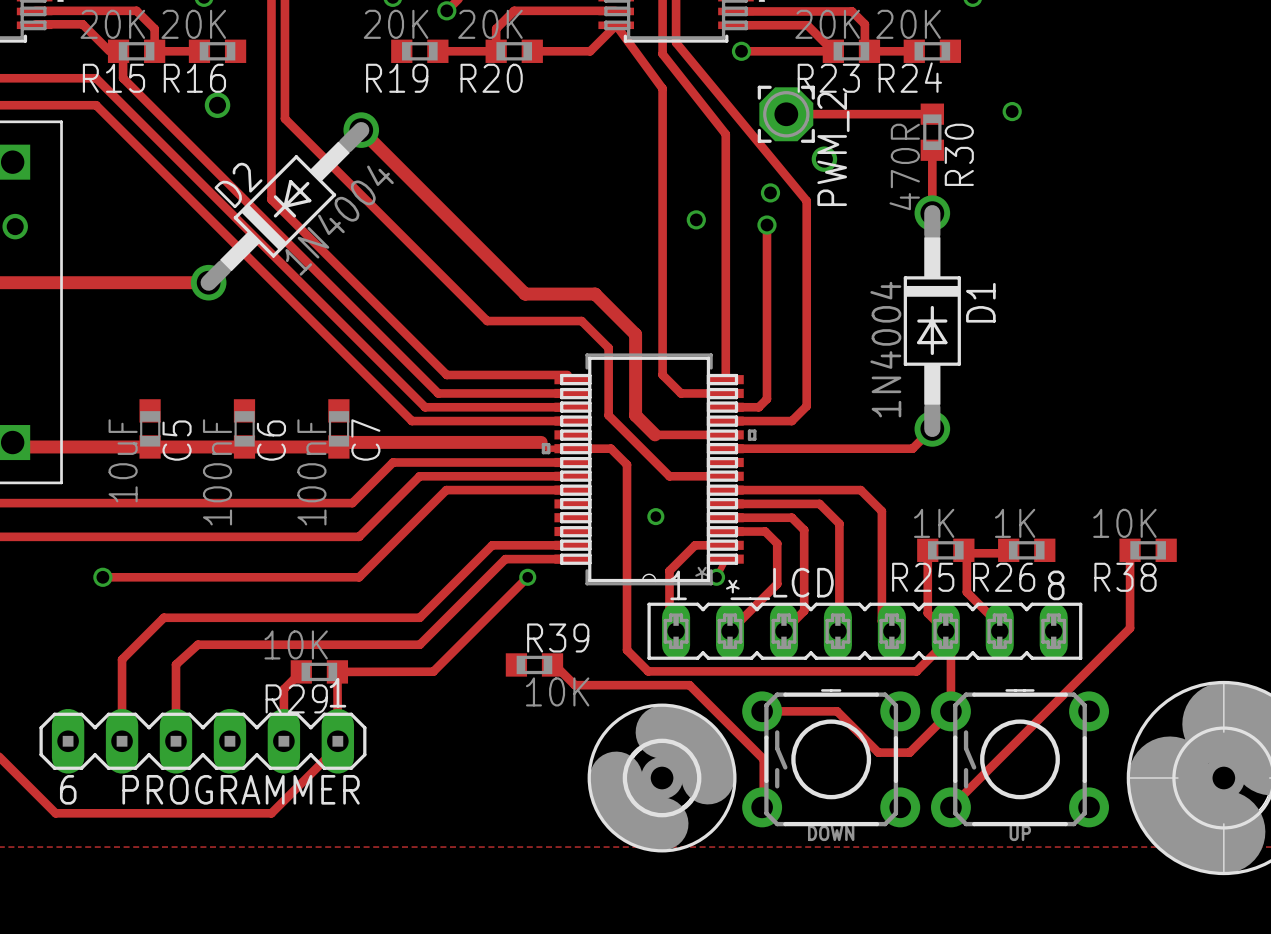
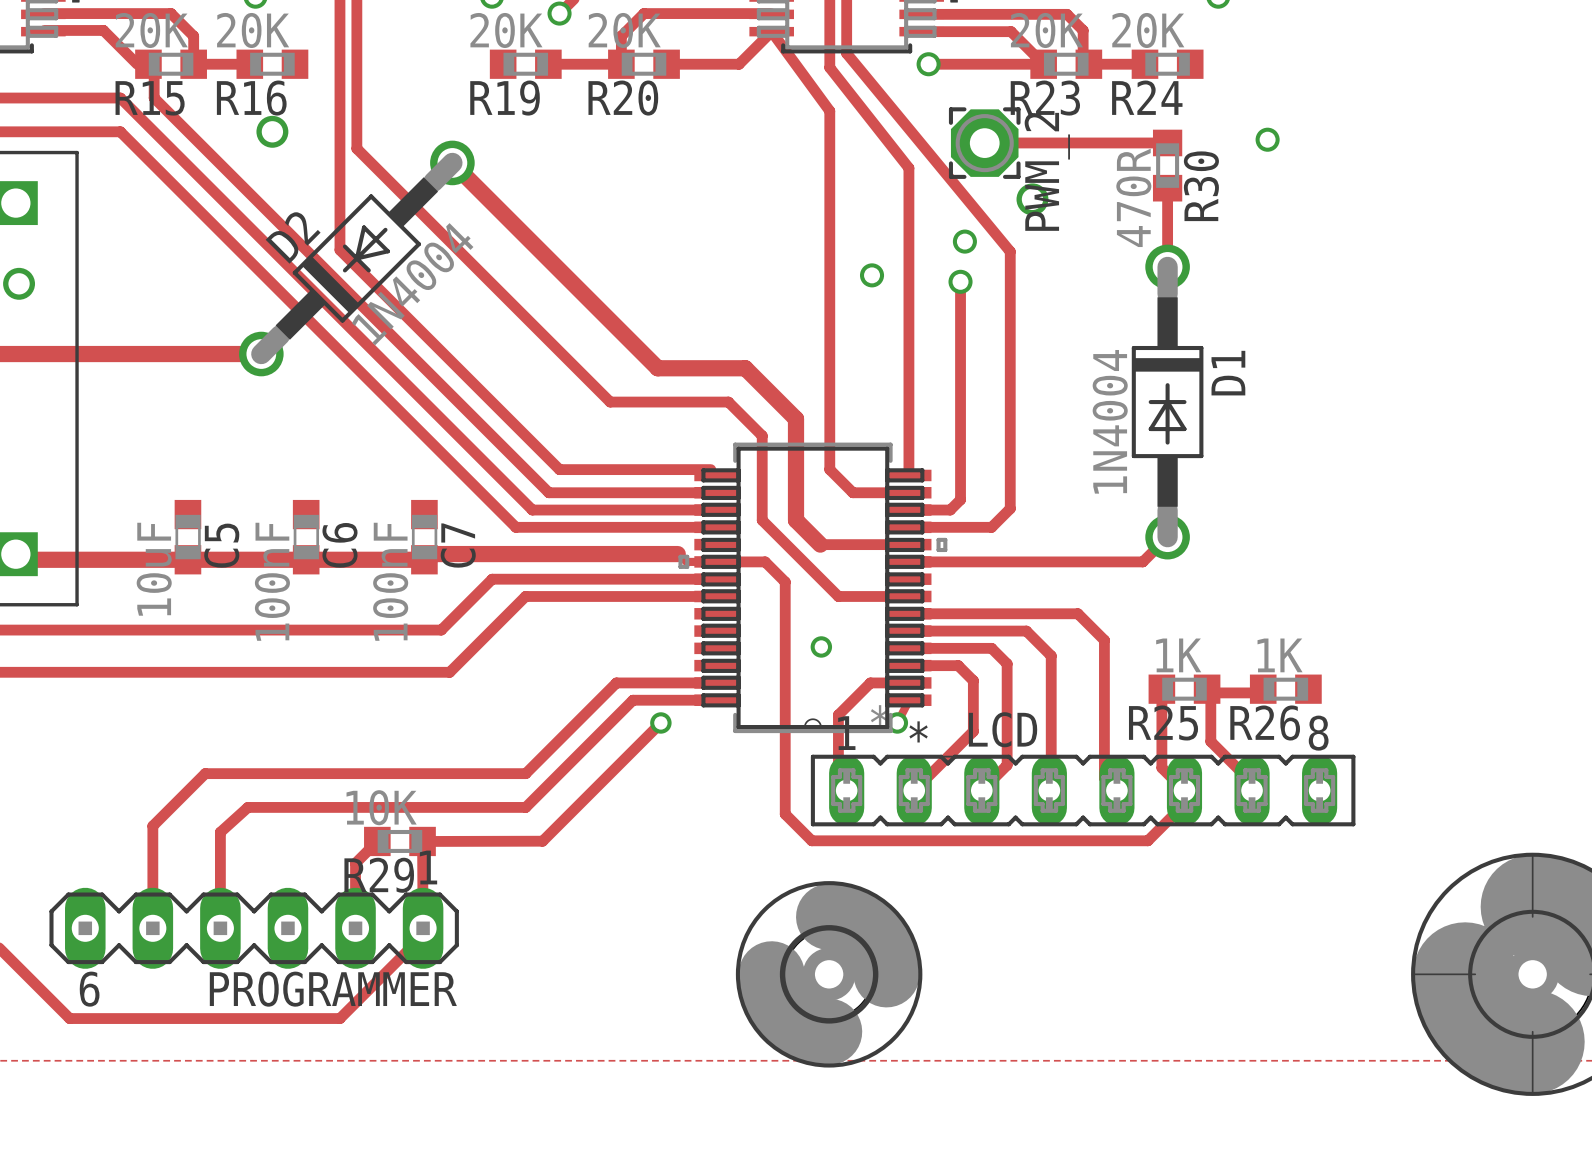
track: (572, 490) (446, 490) (359, 577) (102, 577) -> none
track: (1130, 550) (1130, 628) (950, 807) -> none
R38: 10K (1148, 550) -> none
via: (102, 577) -> none
track: (945, 631) (950, 636) (950, 711) (909, 752) (878, 752) (837, 711) (762, 711) -> none
R39: 10K (534, 664) -> none
track: (552, 664) (574, 685) (689, 685) (763, 759) (763, 805) (762, 807) -> none
part: DOWN (831, 759) -> none
part: UP (1020, 759) -> none

